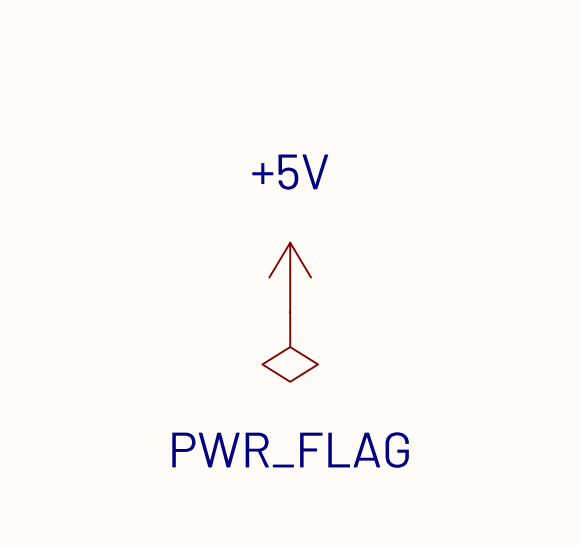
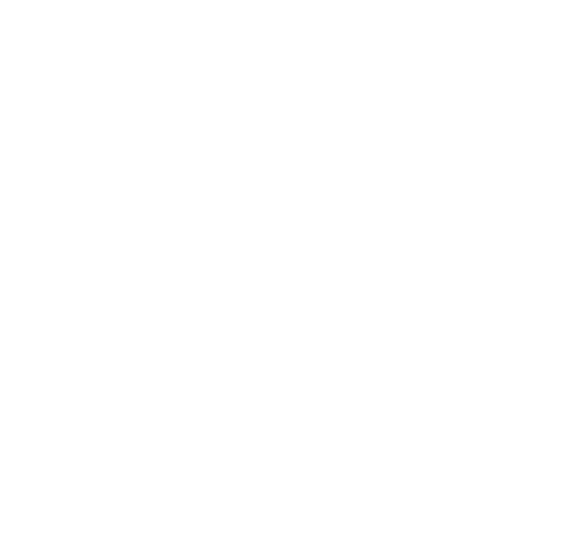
power symbol: +5V (290, 277) -> none
power symbol: PWR_FLAG (290, 347) -> none

